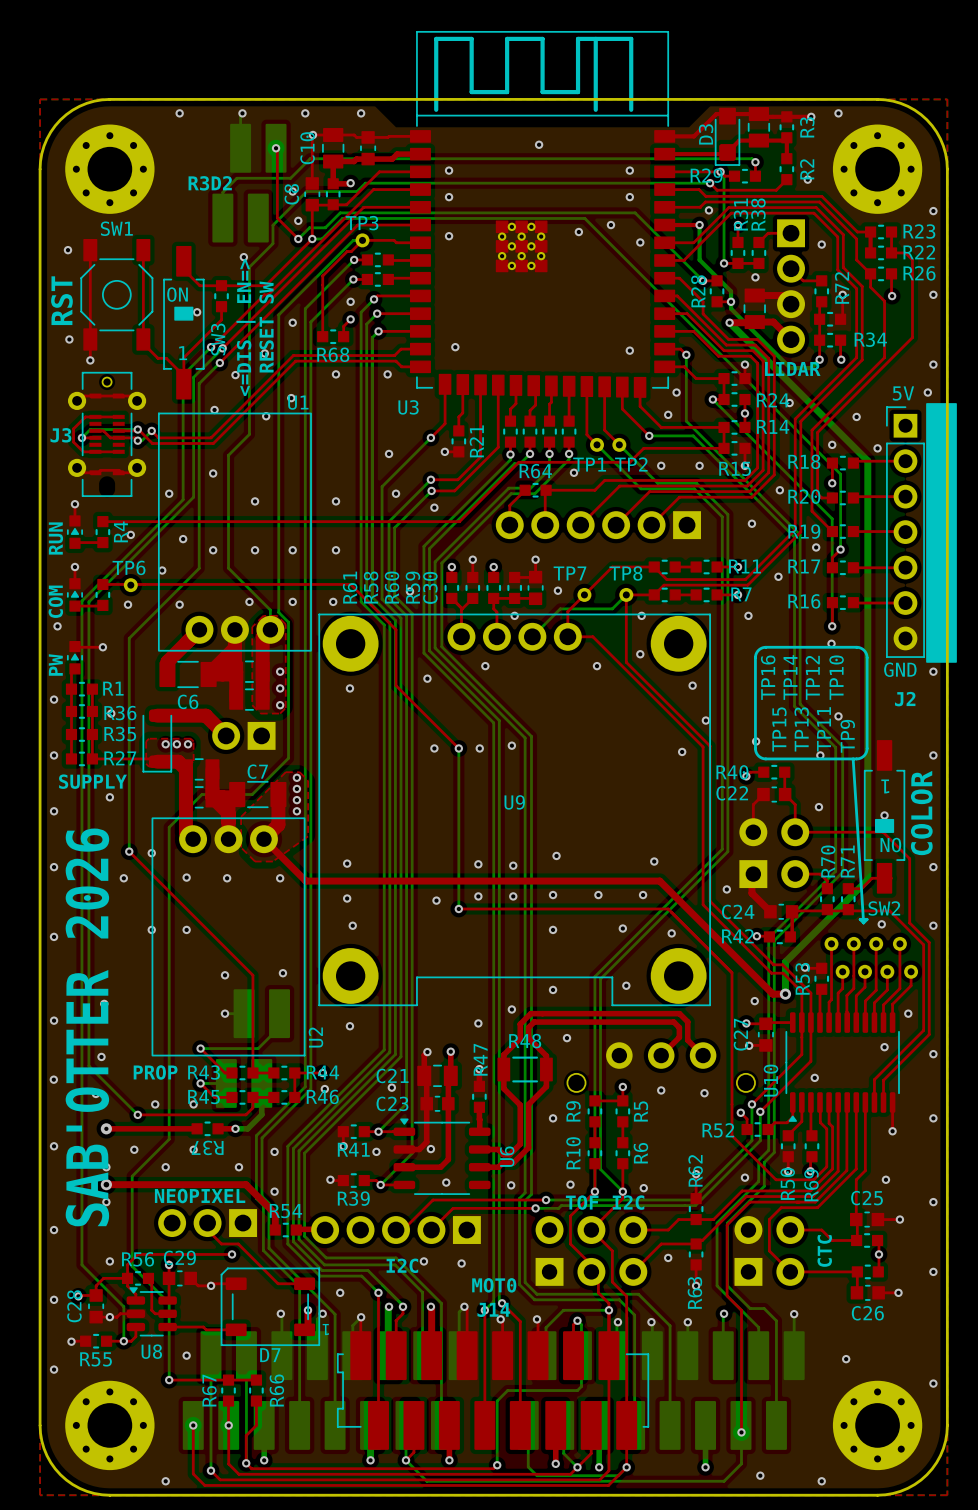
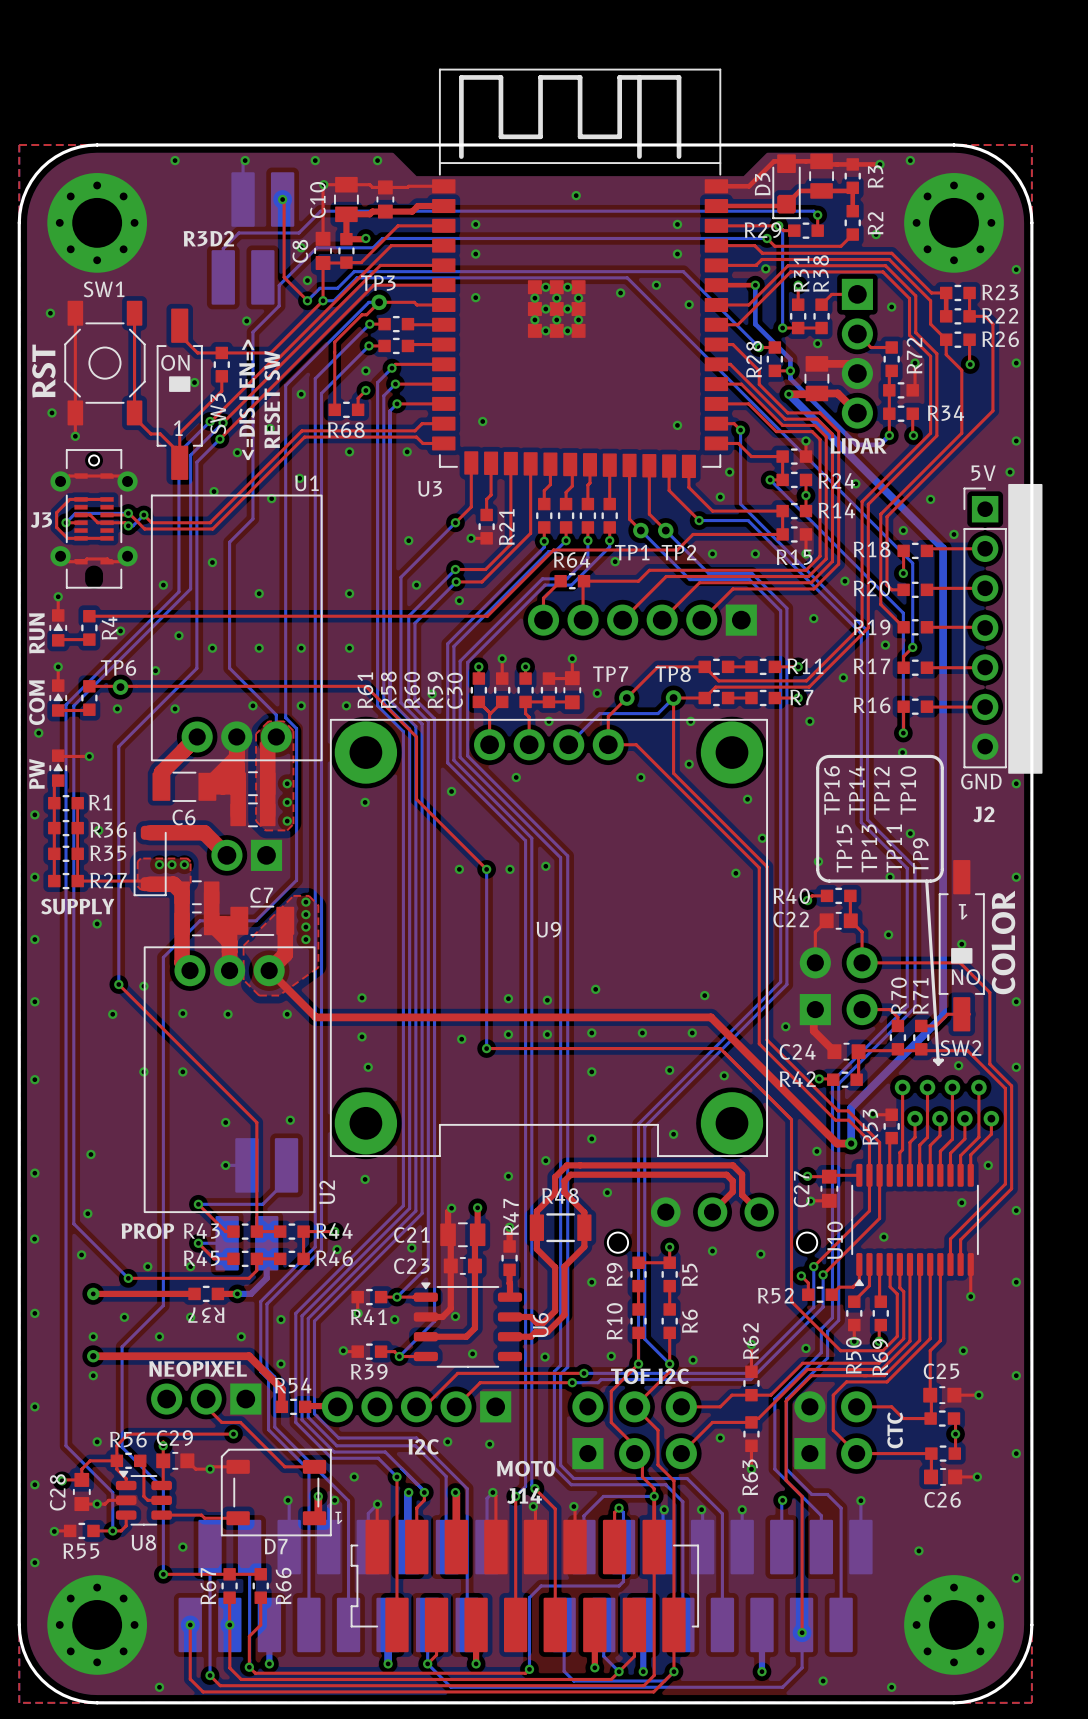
text: SAB'OTTER 2026 (87, 1027) -> none

